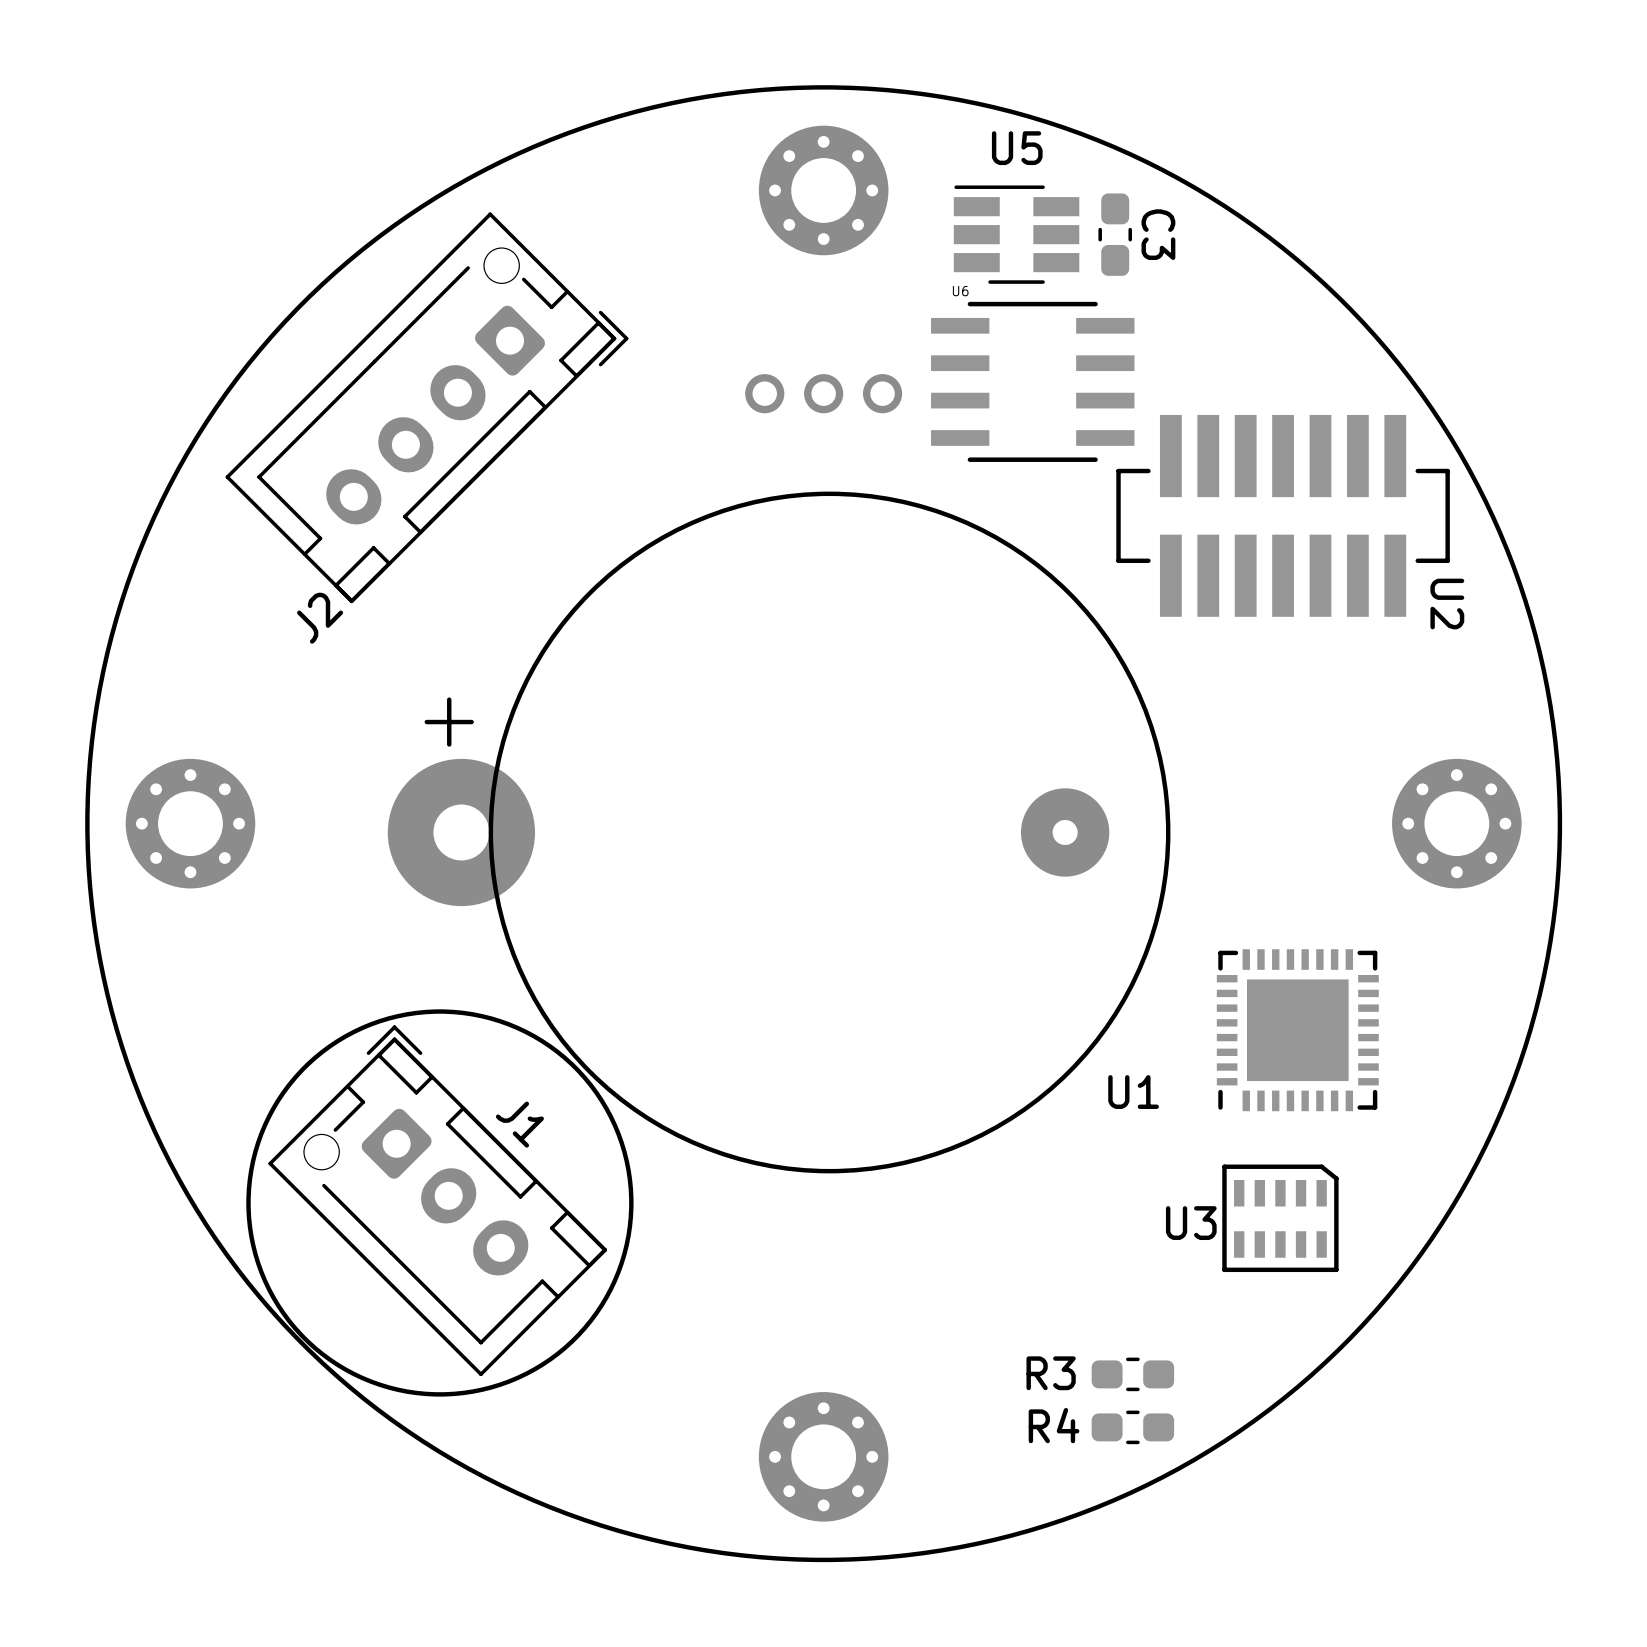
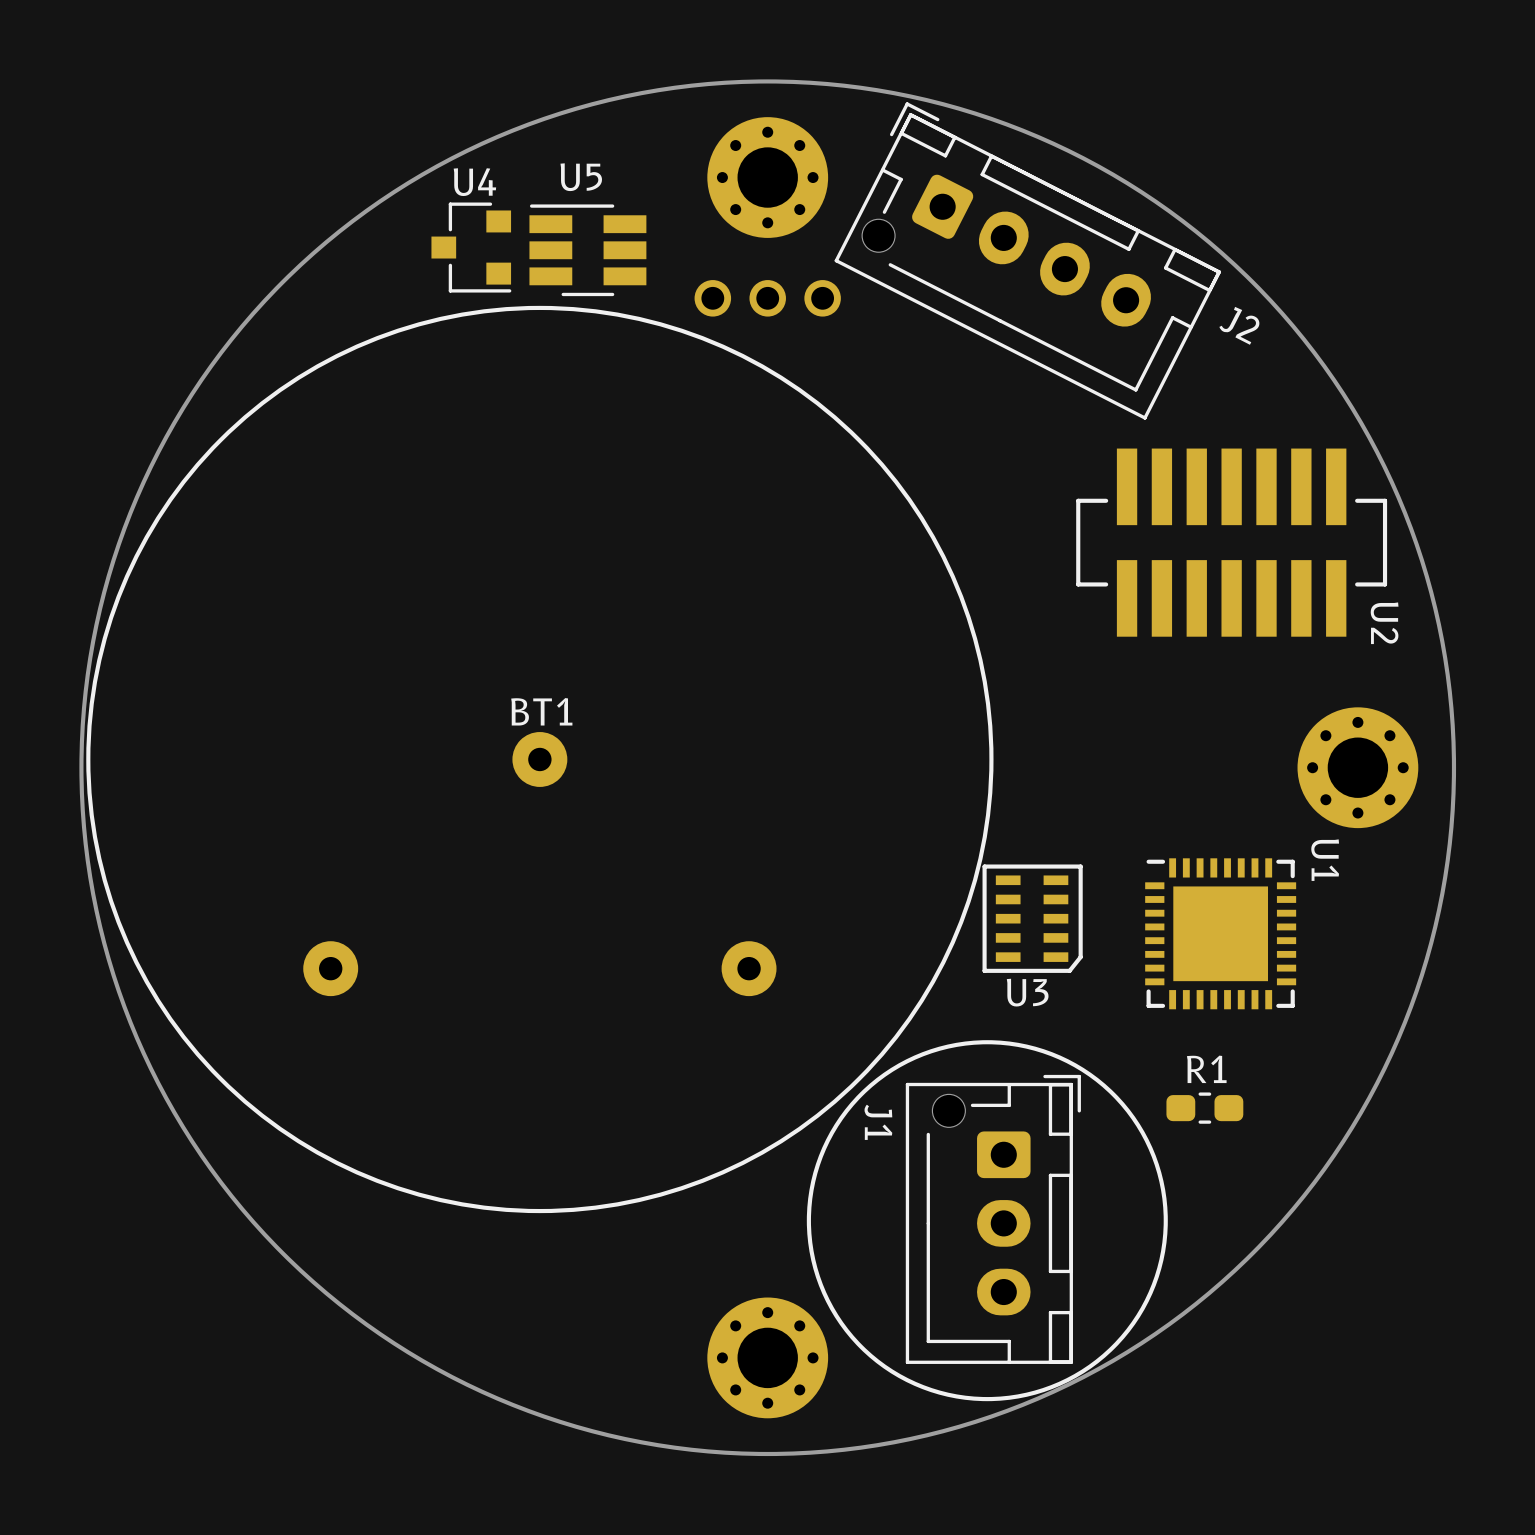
U5 name position: U5 (1017, 148) -> U5 (581, 177)
J2 footprint: [225, 212, 629, 604] -> [834, 102, 1222, 420]
U5 position: (1016, 234) -> (587, 250)
C3: (1115, 234) -> none
U4: none -> (471, 247)
U6: (1032, 381) -> none
part position: (823, 393) -> (767, 298)
U2 position: (1283, 515) -> (1231, 542)
J2 name position: J2 (320, 618) -> J2 (1239, 325)
BT1: none -> (539, 759)
part: (190, 823) -> none
part: (779, 832) -> none
J1 footprint: [268, 1025, 608, 1377] -> [905, 1074, 1081, 1364]
U1 rotation: 0° (1297, 1030) -> 90° clockwise (1220, 933)
U1 name position: U1 (1133, 1092) -> U1 (1325, 860)
J1 name position: J1 (519, 1124) -> J1 (878, 1122)
R1: none -> (1204, 1108)
drawing position: (439, 1202) -> (987, 1220)
U3 rotation: 0° (1280, 1218) -> 90° clockwise (1032, 918)
U3 position: (1280, 1218) -> (1032, 918)
U3 name position: U3 (1191, 1223) -> U3 (1027, 992)
R3: (1132, 1374) -> none
R4: (1132, 1427) -> none

